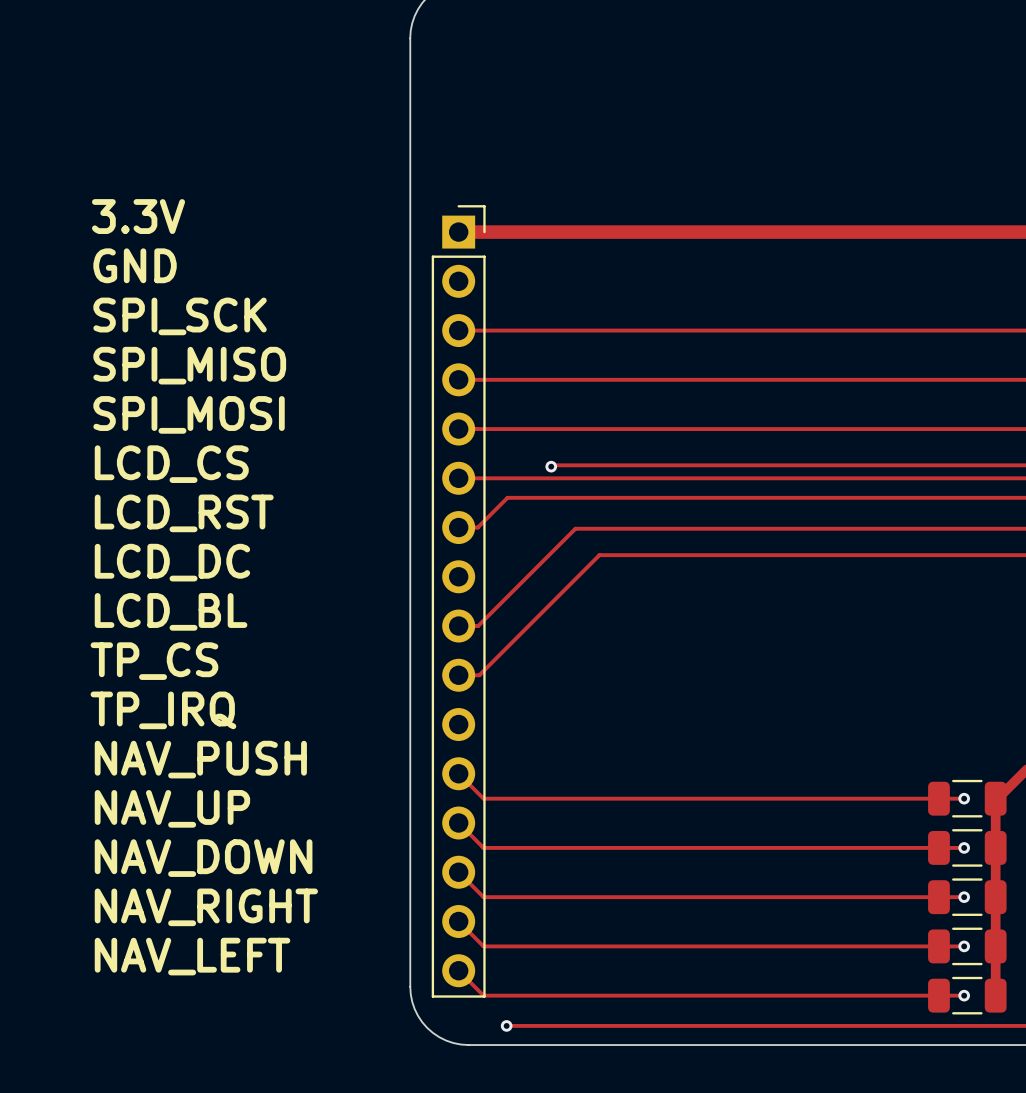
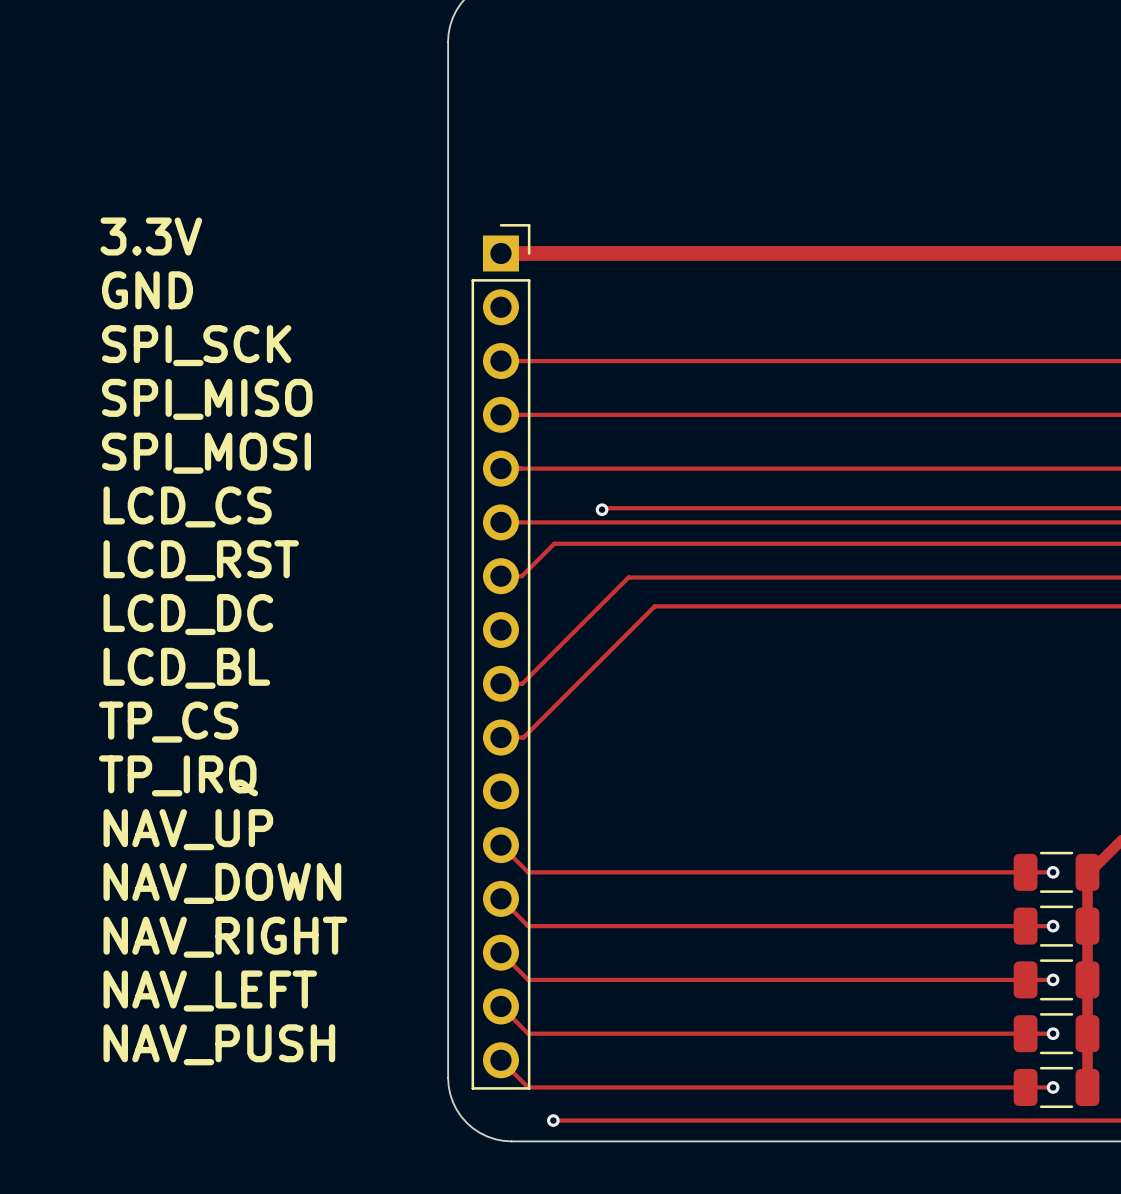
text: NAV_PUSH (200, 759) -> NAV_UP (188, 829)
text: NAV_UP (172, 808) -> NAV_DOWN (222, 883)
text: NAV_DOWN (203, 858) -> NAV_RIGHT (225, 937)
text: NAV_RIGHT (206, 907) -> NAV_LEFT (210, 991)
text: NAV_LEFT (192, 956) -> NAV_PUSH (219, 1044)

